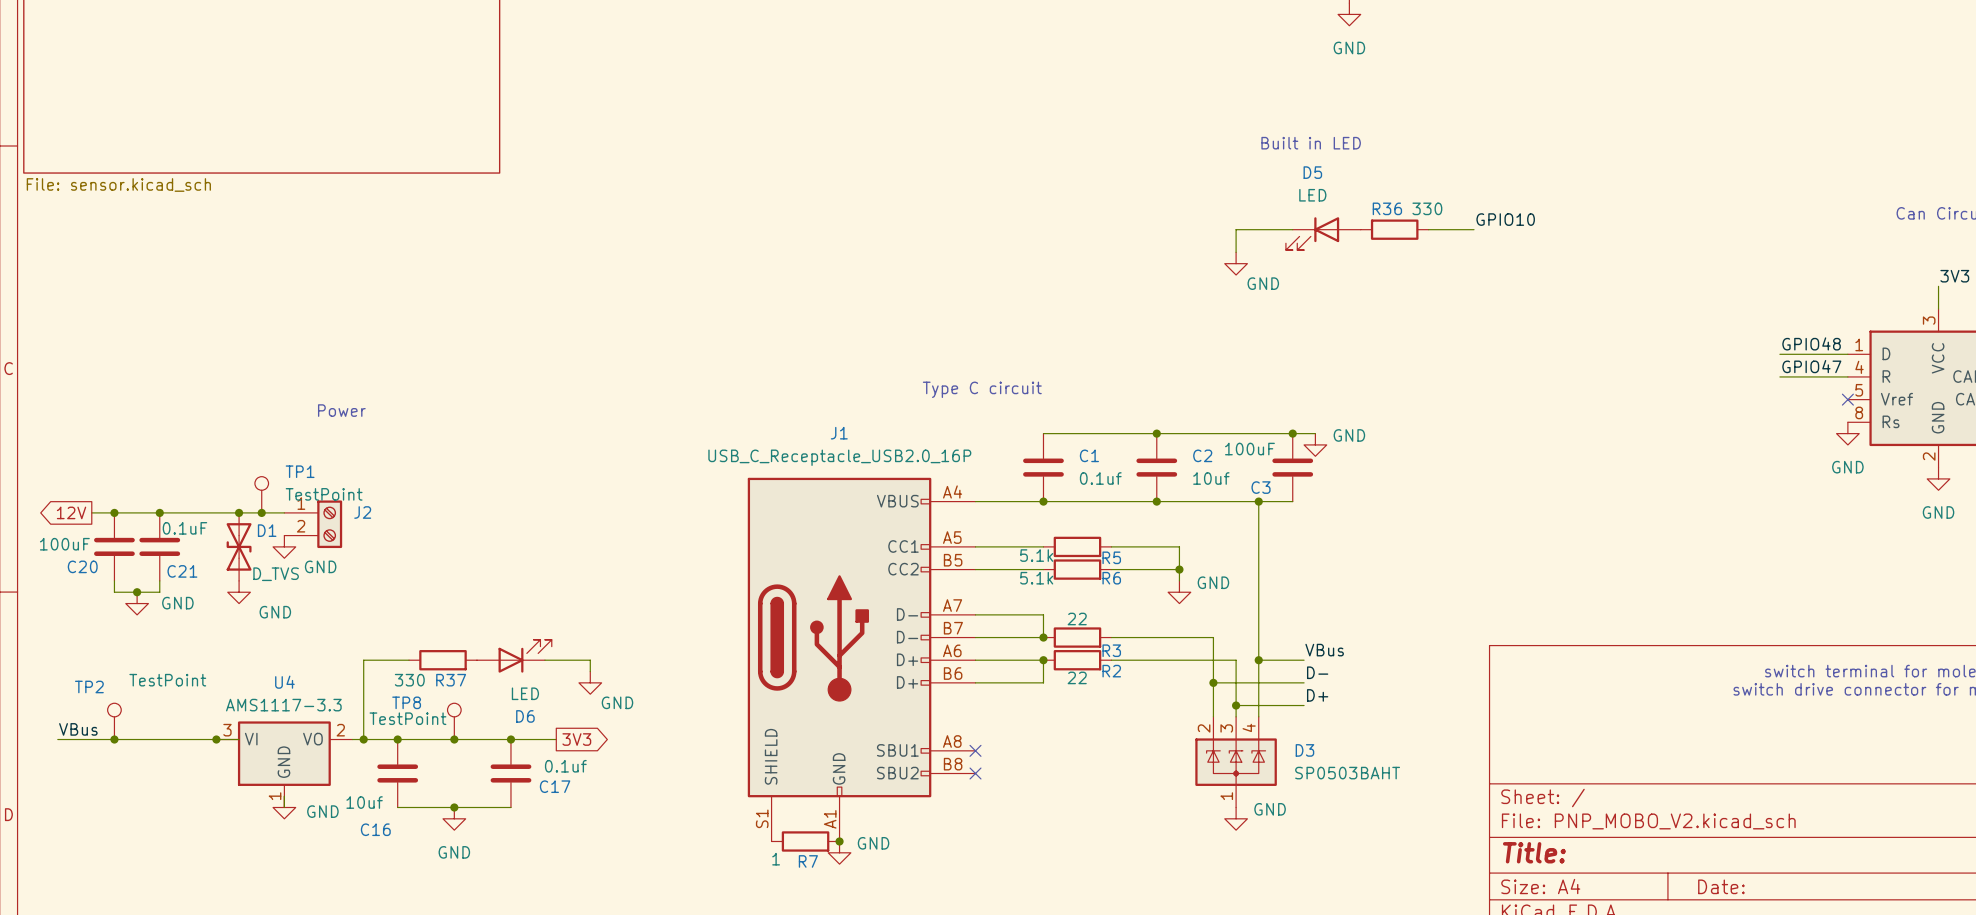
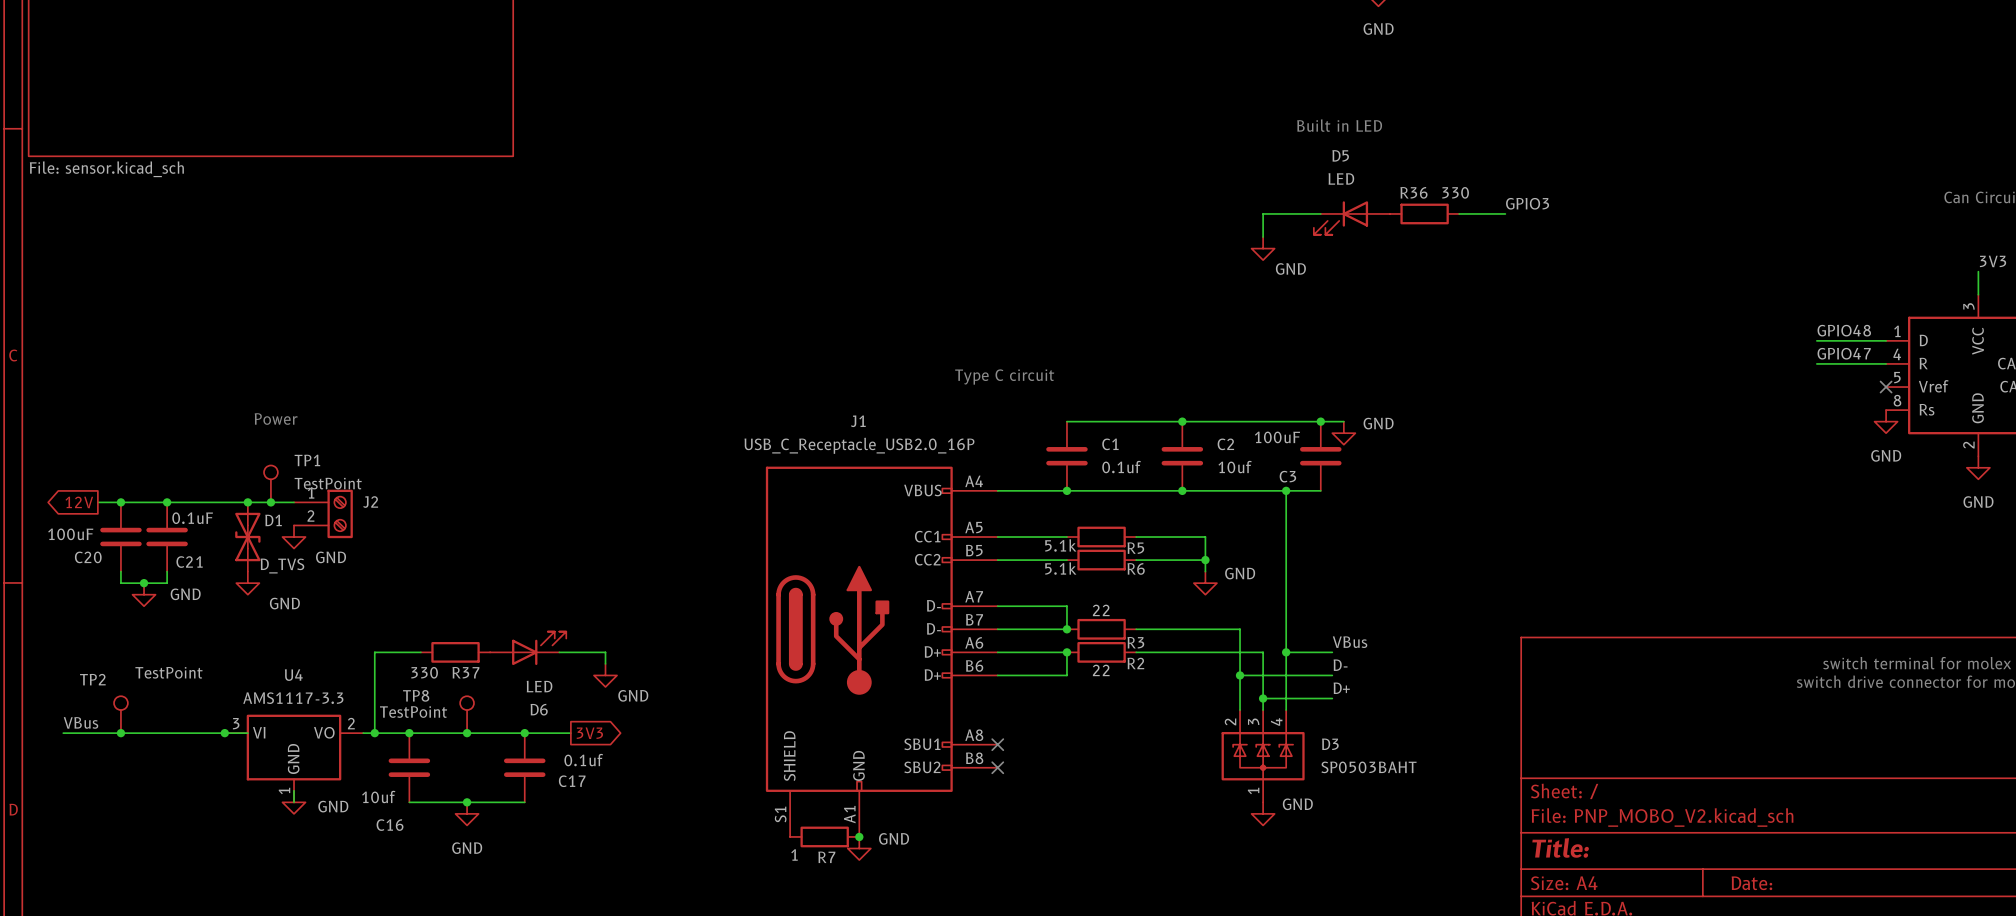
label: GPIO10 (1505, 219) -> GPIO3 (1527, 203)
text position: Power (341, 410) -> Power (276, 419)

